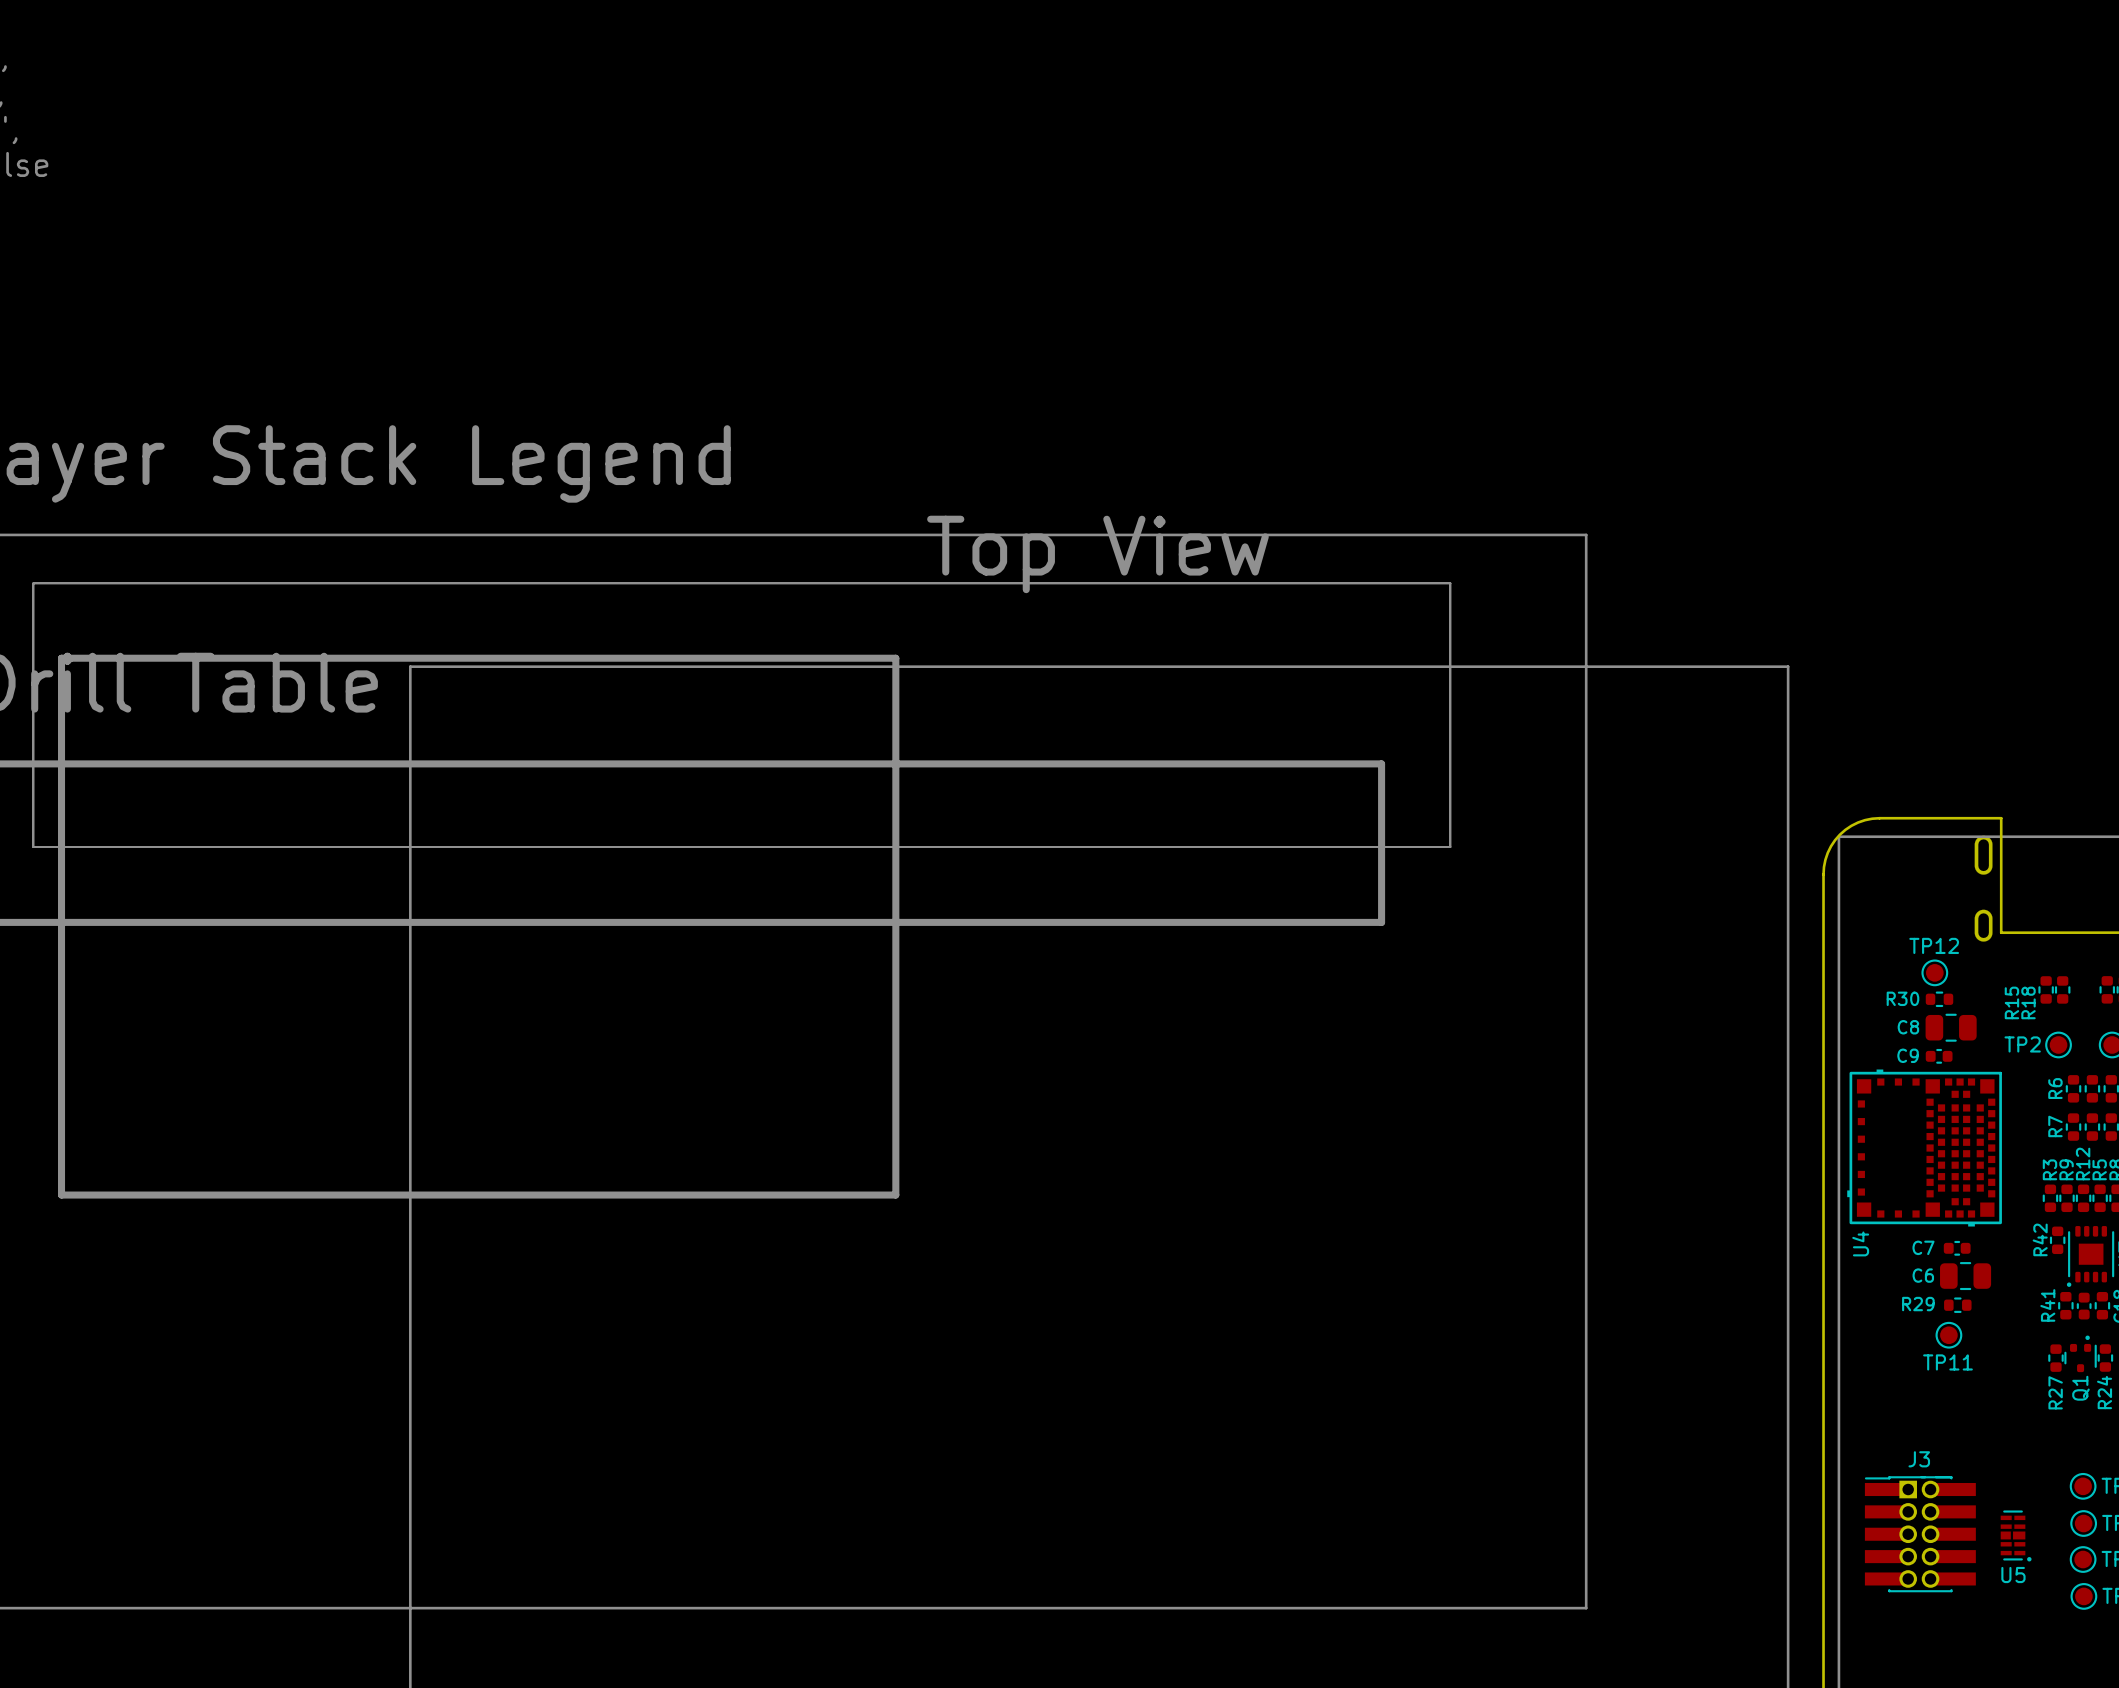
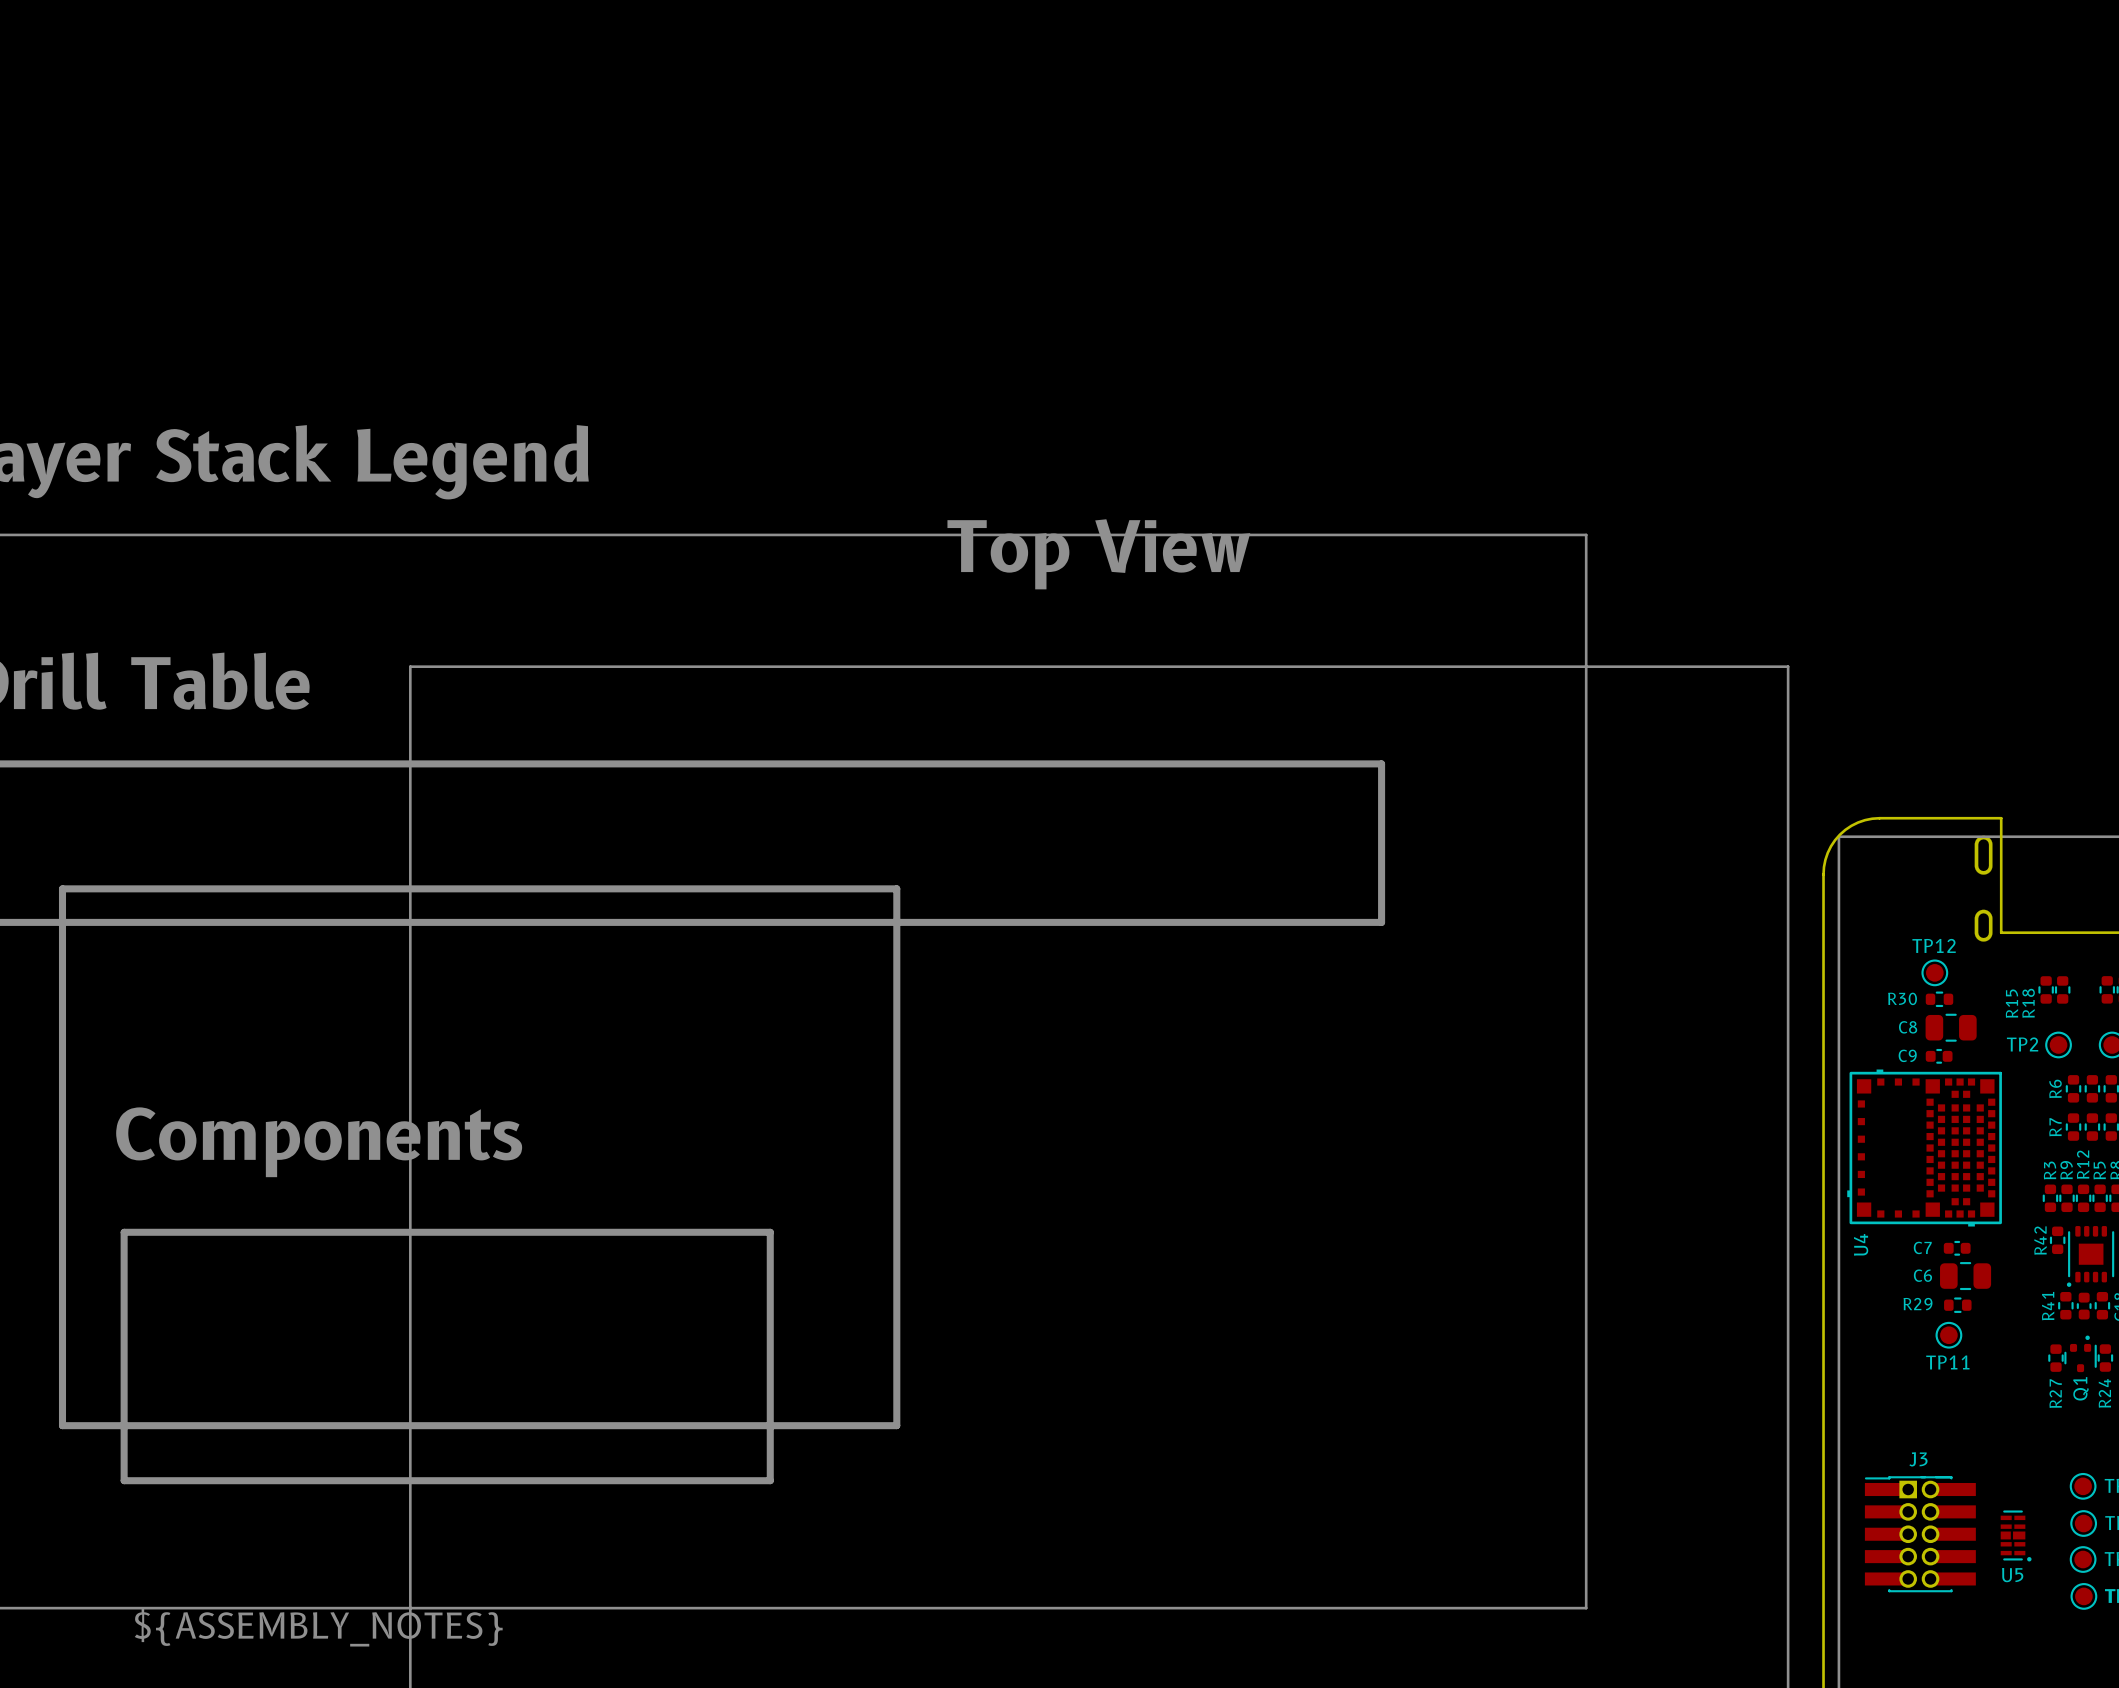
line: (61, 658) (895, 658) (895, 1195) (61, 1195) (61, 658) -> (62, 888) (896, 888) (896, 1425) (62, 1425) (62, 888)
line: (33, 847) (33, 583) (1450, 583) (1450, 847) (33, 846) (33, 583) (1450, 583) (1450, 846) -> none
text: none -> Components (319, 1142)
line: none -> (124, 1232) (124, 1480) (770, 1480) (770, 1232) (124, 1232)
text: none -> ${ASSEMBLY_NOTES} (318, 1627)

